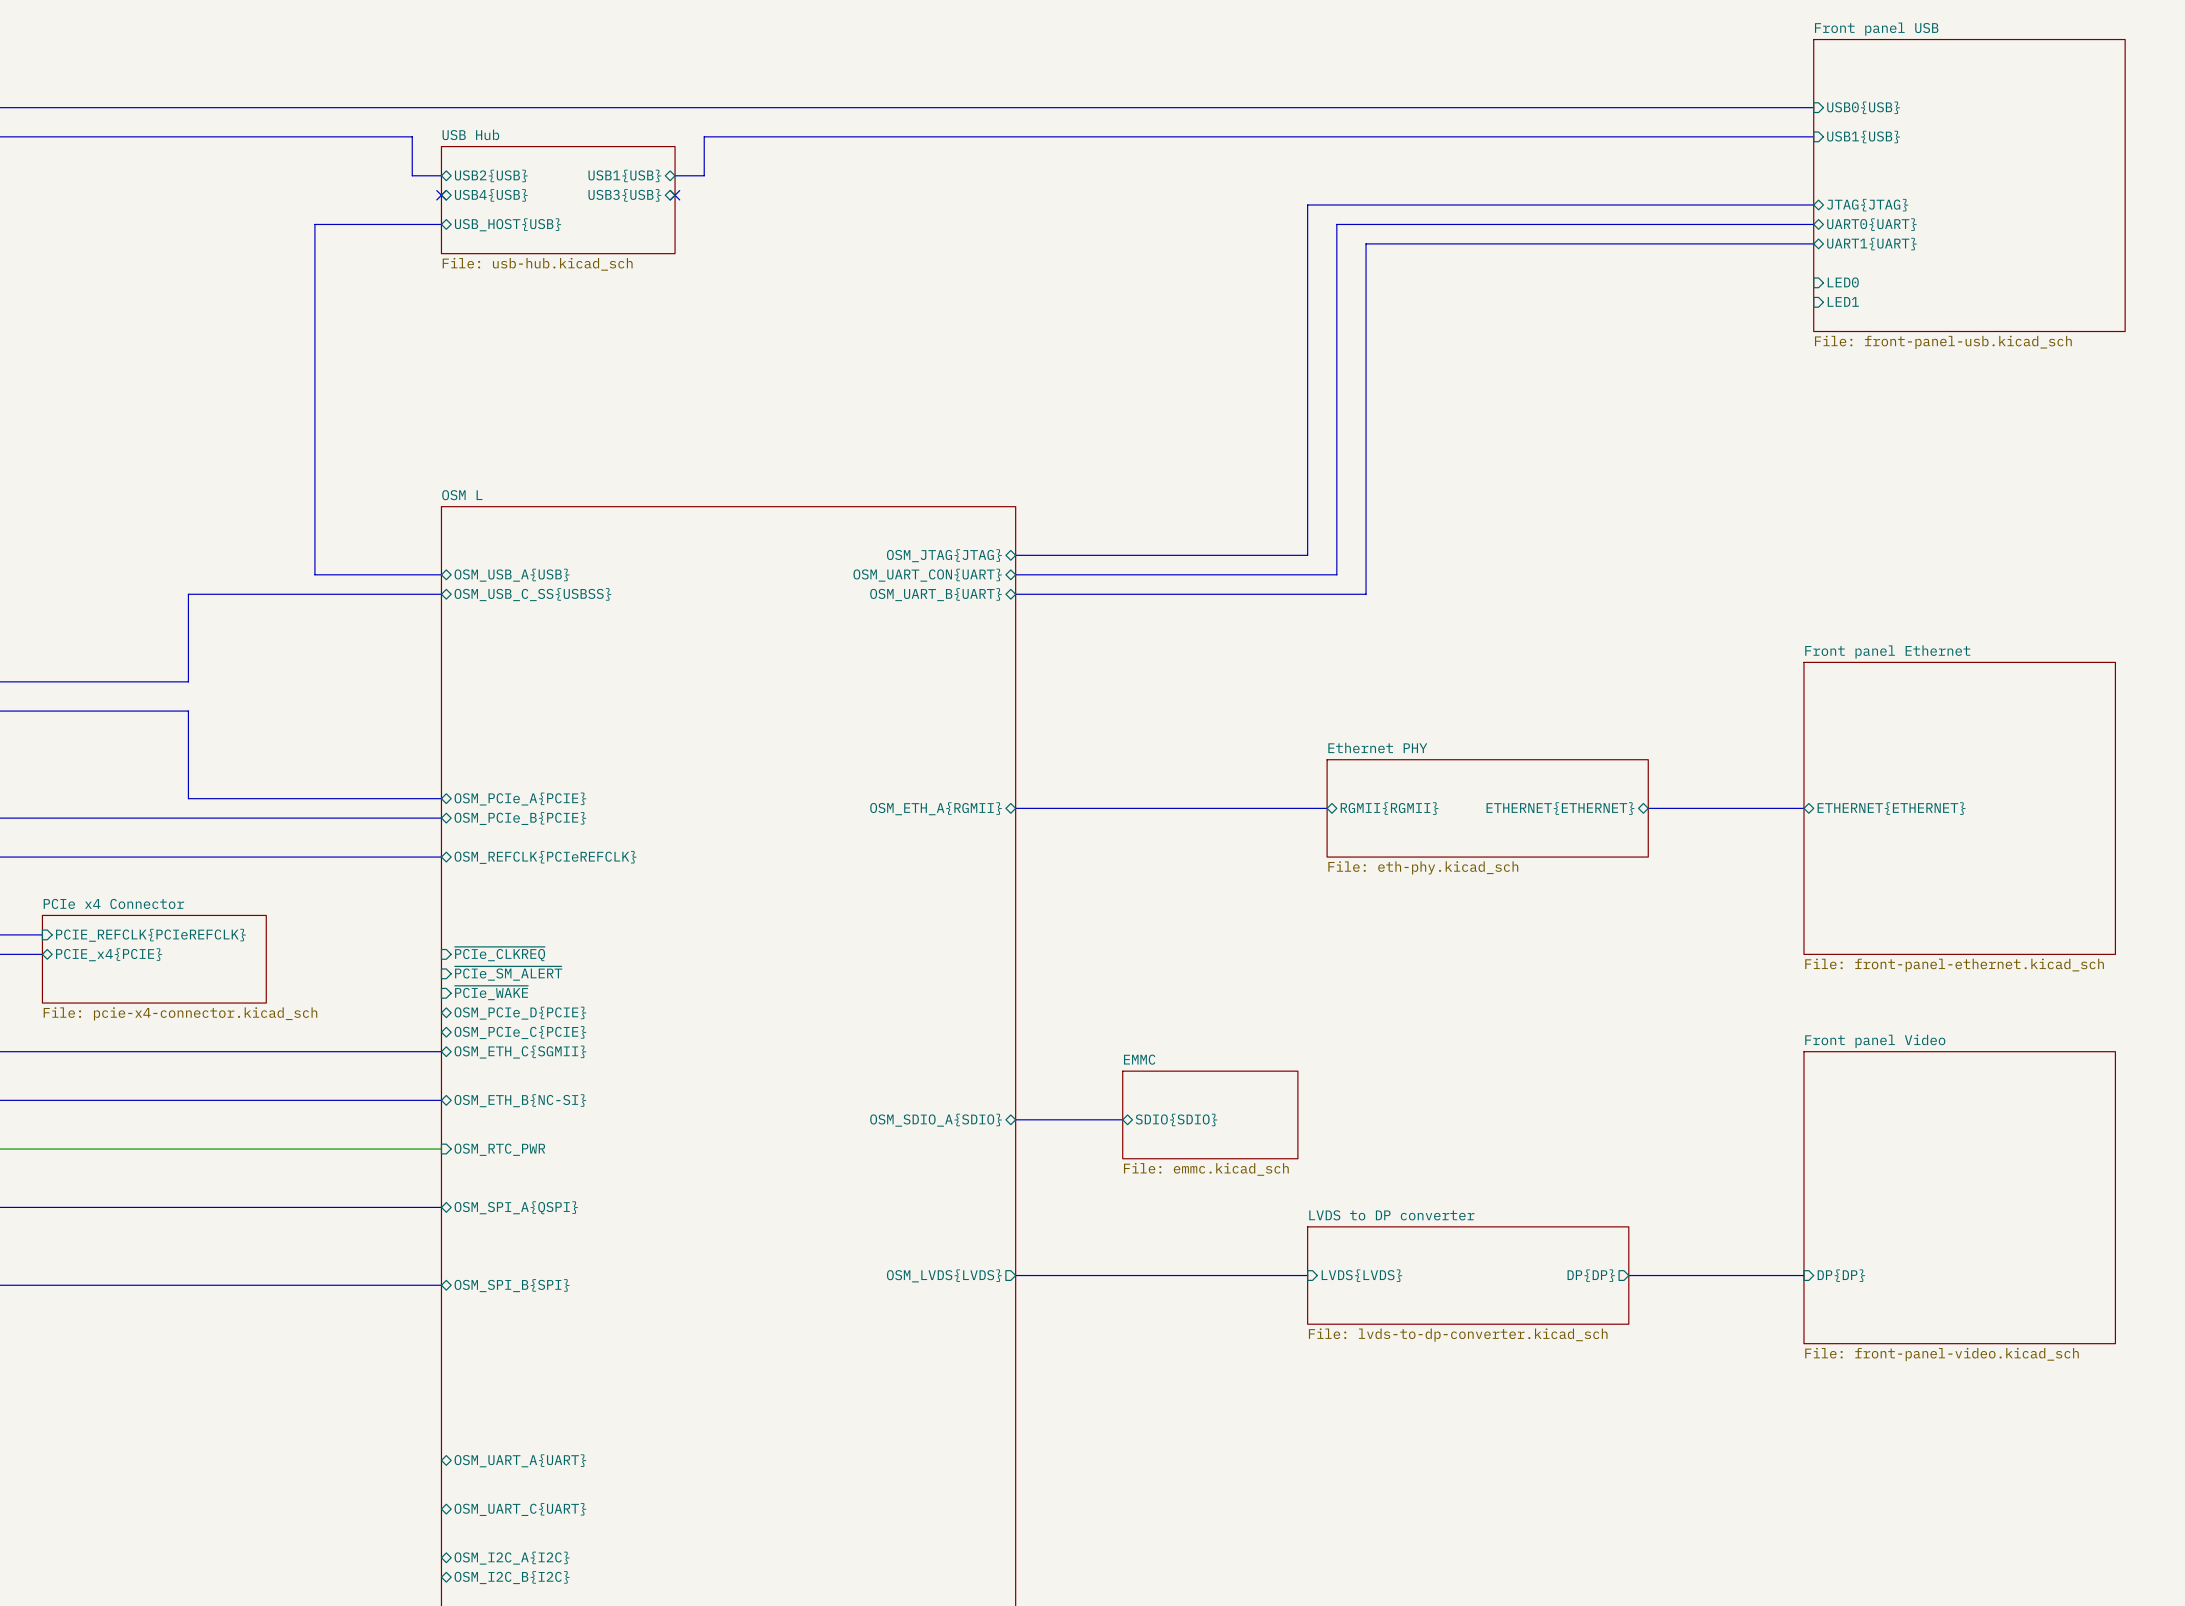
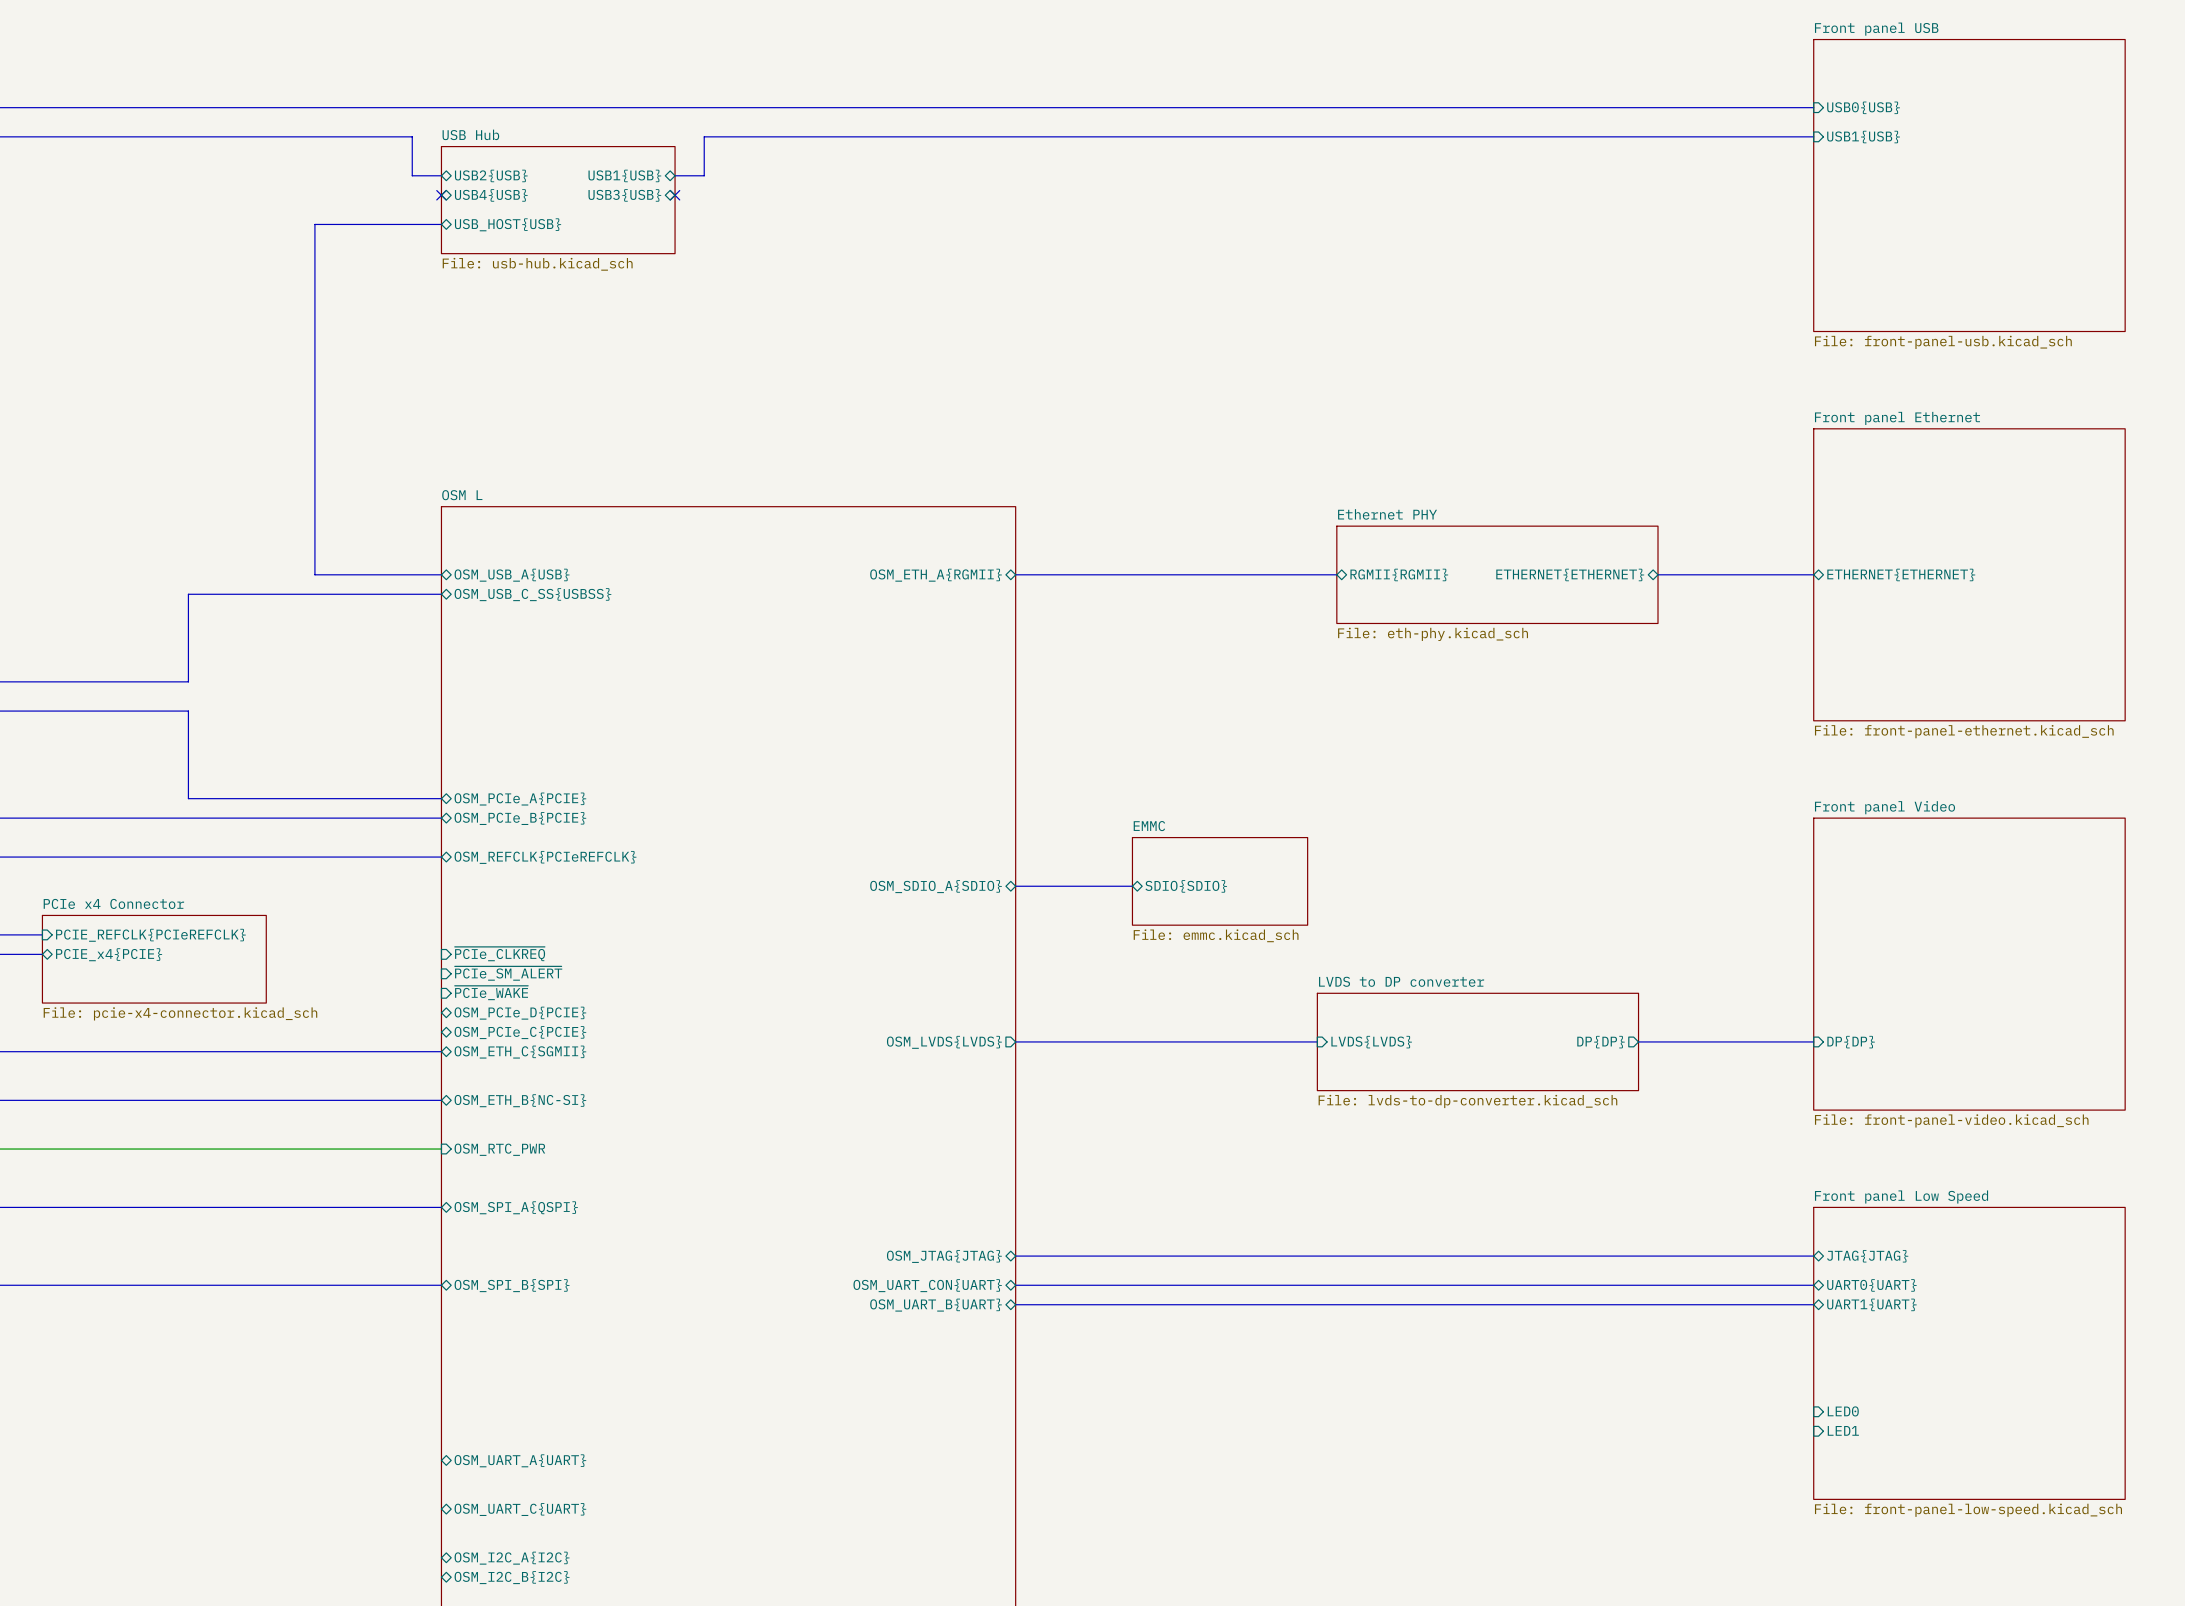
bus: (1813, 204) (1307, 204) (1307, 555) (1015, 555) -> none
sheet pin: JTAG{JTAG} (1867, 205) -> none
bus: (1813, 224) (1336, 224) (1336, 574) -> none
sheet pin: UART0{UART} (1871, 224) -> none
bus: (1813, 243) (1366, 243) (1366, 594) (1015, 594) -> none
sheet pin: UART1{UART} (1871, 244) -> none
sheet pin: LED0 (1843, 282) -> none
sheet pin: LED1 (1843, 301) -> none
sheet pin: OSM_JTAG{JTAG} (944, 555) -> none
sheet pin: none -> RGMII{RGMII} (1399, 574)
sheet Ethernet PHY: none -> File: eth-phy.kicad_sch (1497, 574)
sheet pin: none -> ETHERNET{ETHERNET} (1570, 574)
bus: none -> (1658, 574) (1813, 574)
sheet pin: none -> ETHERNET{ETHERNET} (1901, 574)
sheet Front panel Ethernet: none -> File: front-panel-ethernet.kicad_sch (1969, 574)
sheet pin: OSM_UART_CON{UART} (927, 575) -> OSM_ETH_A{RGMII} (936, 575)
sheet pin: OSM_UART_B{UART} (936, 594) -> none
sheet pin: OSM_ETH_A{RGMII} (936, 808) -> none
bus: (1015, 808) (1327, 808) -> none
sheet pin: RGMII{RGMII} (1389, 808) -> none
sheet Ethernet PHY: File: eth-phy.kicad_sch (1487, 808) -> none
sheet pin: ETHERNET{ETHERNET} (1560, 808) -> none
bus: (1648, 808) (1803, 808) -> none
sheet pin: ETHERNET{ETHERNET} (1891, 808) -> none
sheet Front panel Ethernet: File: front-panel-ethernet.kicad_sch (1959, 808) -> none
sheet EMMC: none -> File: emmc.kicad_sch (1220, 881)
sheet pin: none -> OSM_SDIO_A{SDIO} (936, 886)
bus: none -> (1015, 886) (1132, 886)
sheet pin: none -> SDIO{SDIO} (1186, 886)
sheet Front panel Video: none -> File: front-panel-video.kicad_sch (1969, 964)
bus: none -> (1015, 1041) (1317, 1041)
sheet LVDS to DP converter: none -> File: lvds-to-dp-converter.kicad_sch (1477, 1041)
bus: none -> (1638, 1041) (1813, 1041)
sheet pin: none -> OSM_LVDS{LVDS} (944, 1042)
sheet pin: none -> LVDS{LVDS} (1371, 1042)
sheet pin: none -> DP{DP} (1601, 1042)
sheet pin: none -> DP{DP} (1851, 1042)
sheet EMMC: File: emmc.kicad_sch (1210, 1114) -> none
bus: (1015, 1119) (1122, 1119) -> none
sheet pin: SDIO{SDIO} (1176, 1119) -> none
sheet pin: OSM_SDIO_A{SDIO} (936, 1120) -> none
sheet Front panel Video: File: front-panel-video.kicad_sch (1959, 1197) -> none
sheet pin: none -> OSM_JTAG{JTAG} (944, 1256)
bus: none -> (1015, 1256) (1813, 1256)
sheet pin: none -> JTAG{JTAG} (1867, 1256)
sheet pin: OSM_LVDS{LVDS} (944, 1275) -> none
bus: (1015, 1275) (1307, 1275) -> none
sheet pin: LVDS{LVDS} (1361, 1275) -> none
sheet LVDS to DP converter: File: lvds-to-dp-converter.kicad_sch (1468, 1275) -> none
sheet pin: DP{DP} (1591, 1275) -> none
bus: (1628, 1275) (1803, 1275) -> none
sheet pin: DP{DP} (1841, 1275) -> none
sheet pin: none -> OSM_UART_CON{UART} (927, 1285)
bus: none -> (1015, 1285) (1813, 1285)
sheet pin: none -> UART0{UART} (1871, 1285)
bus: none -> (1015, 1304) (1813, 1304)
sheet pin: none -> UART1{UART} (1871, 1304)
sheet pin: none -> OSM_UART_B{UART} (936, 1305)
sheet Front panel Low Speed: none -> File: front-panel-low-speed.kicad_sch (1969, 1353)
sheet pin: none -> LED0 (1843, 1411)
sheet pin: none -> LED1 (1843, 1430)

